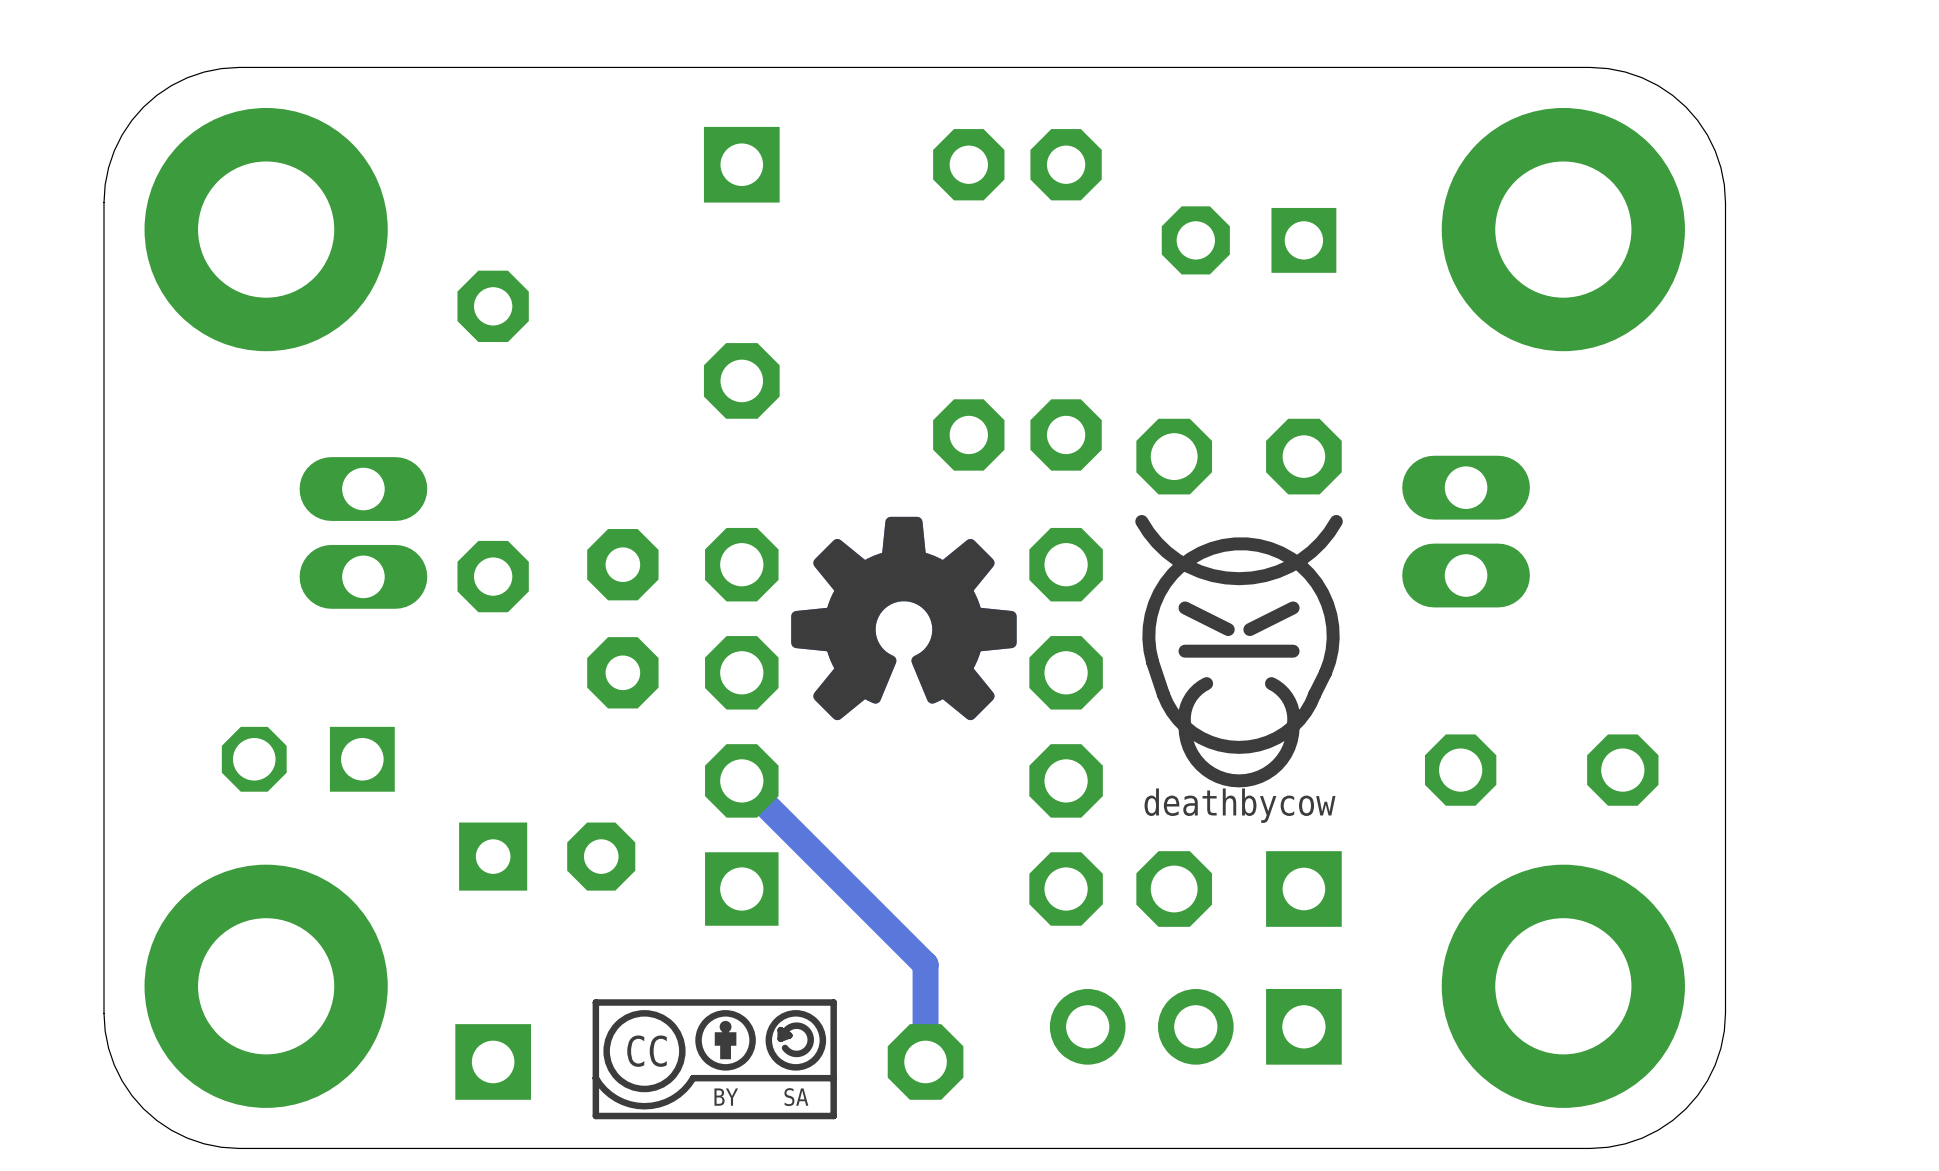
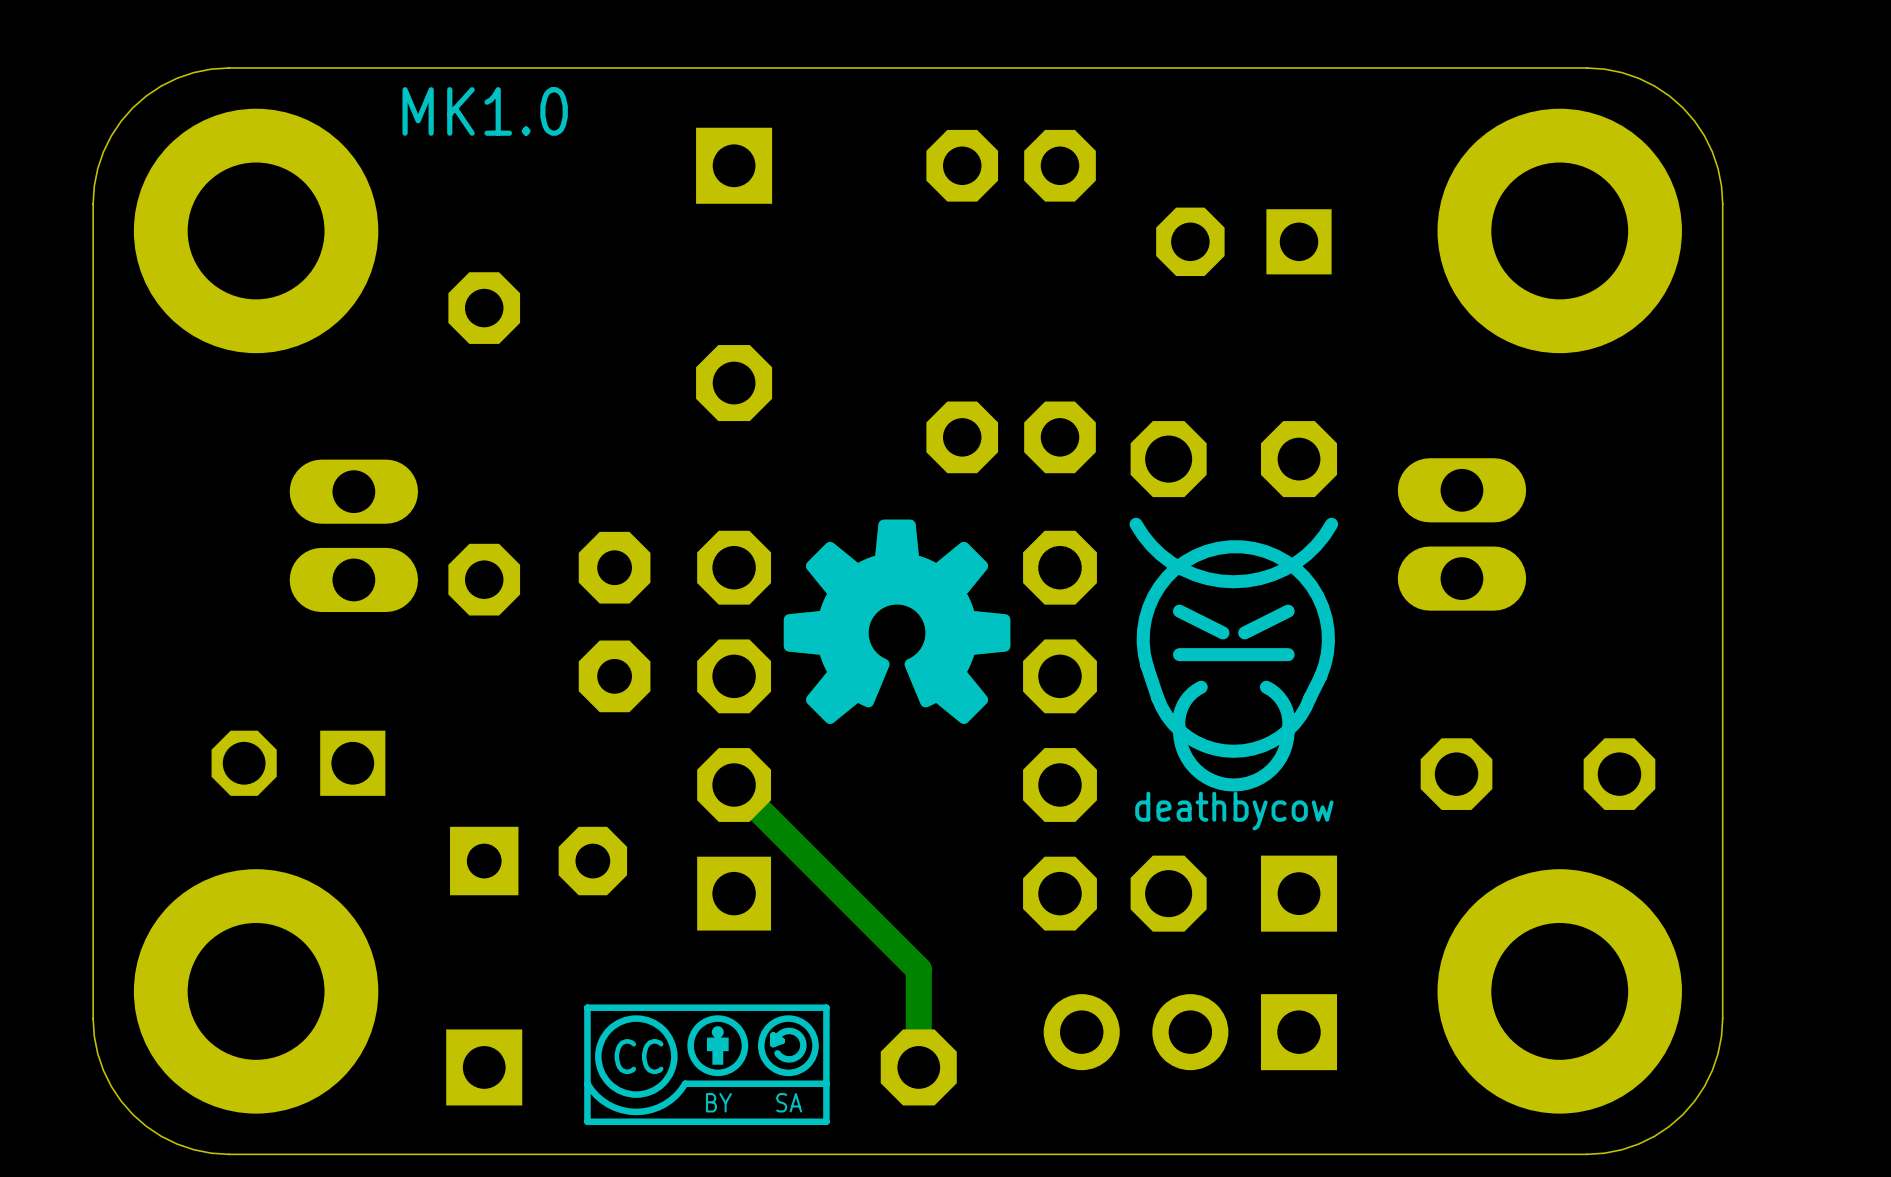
text: none -> MK1.0 (485, 111)

